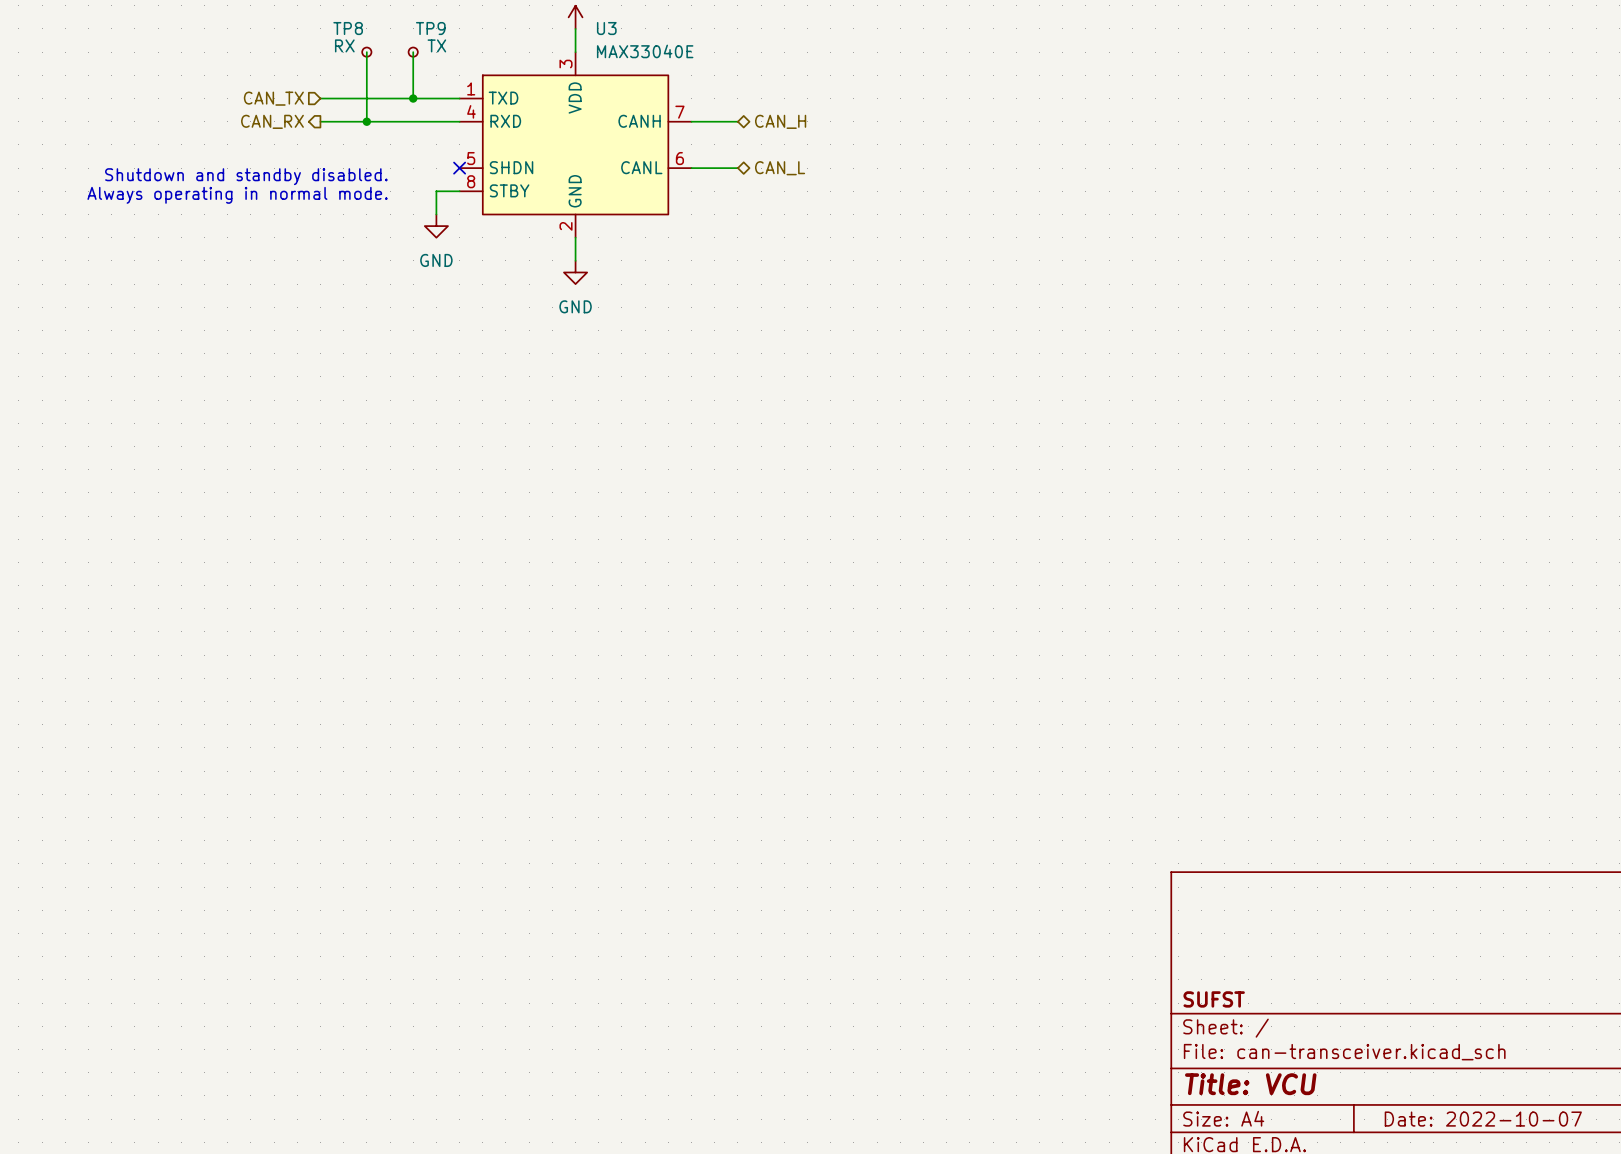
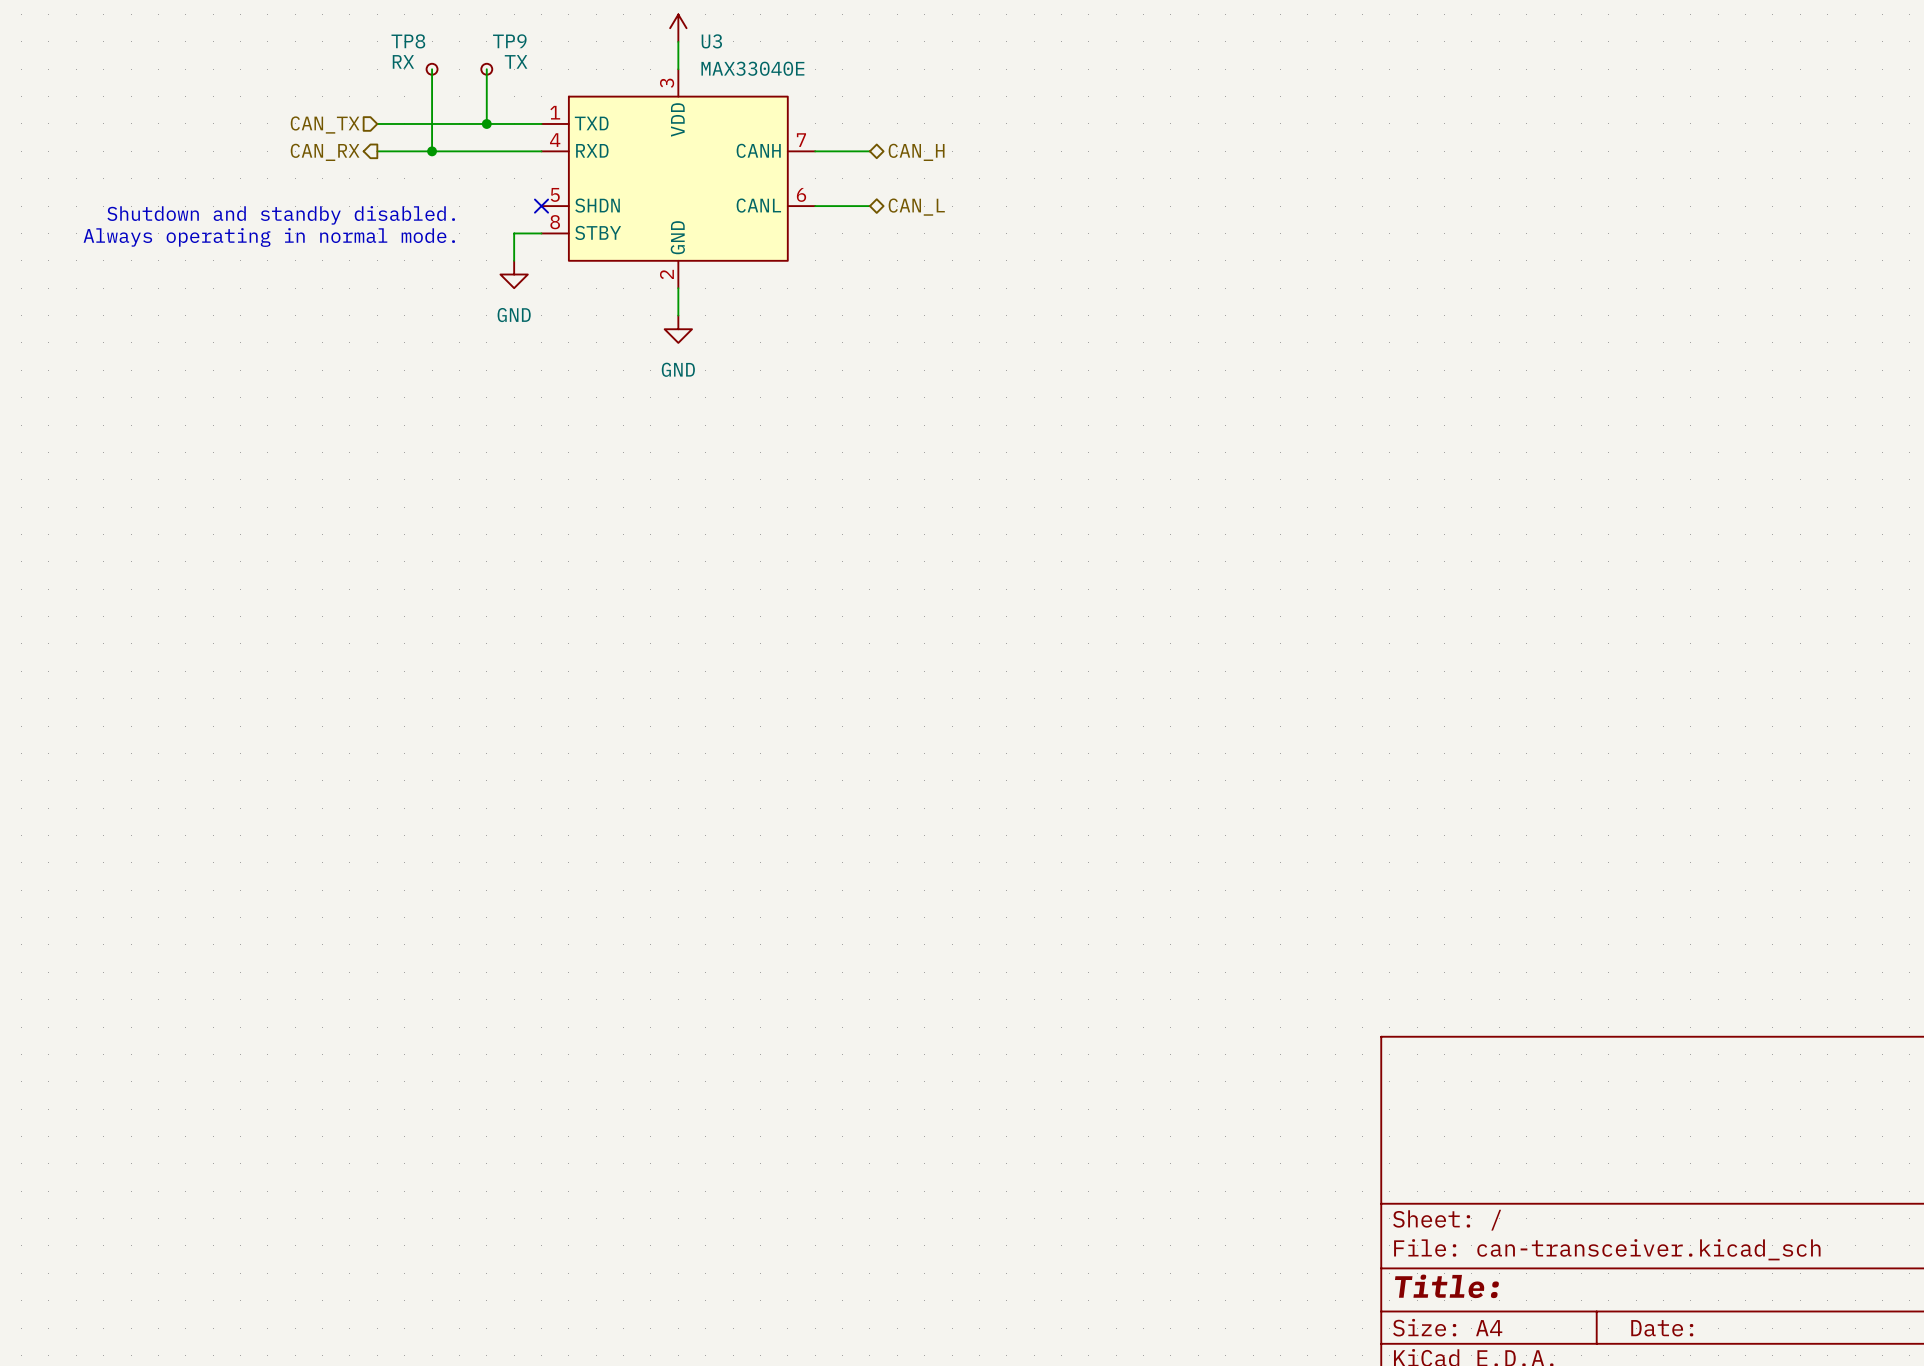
title block: SUFST (1214, 999) -> none
title block: Title: VCU (1250, 1084) -> Title: (1446, 1286)
title block: Date: 2022-10-07 (1483, 1119) -> Date: (1662, 1328)

